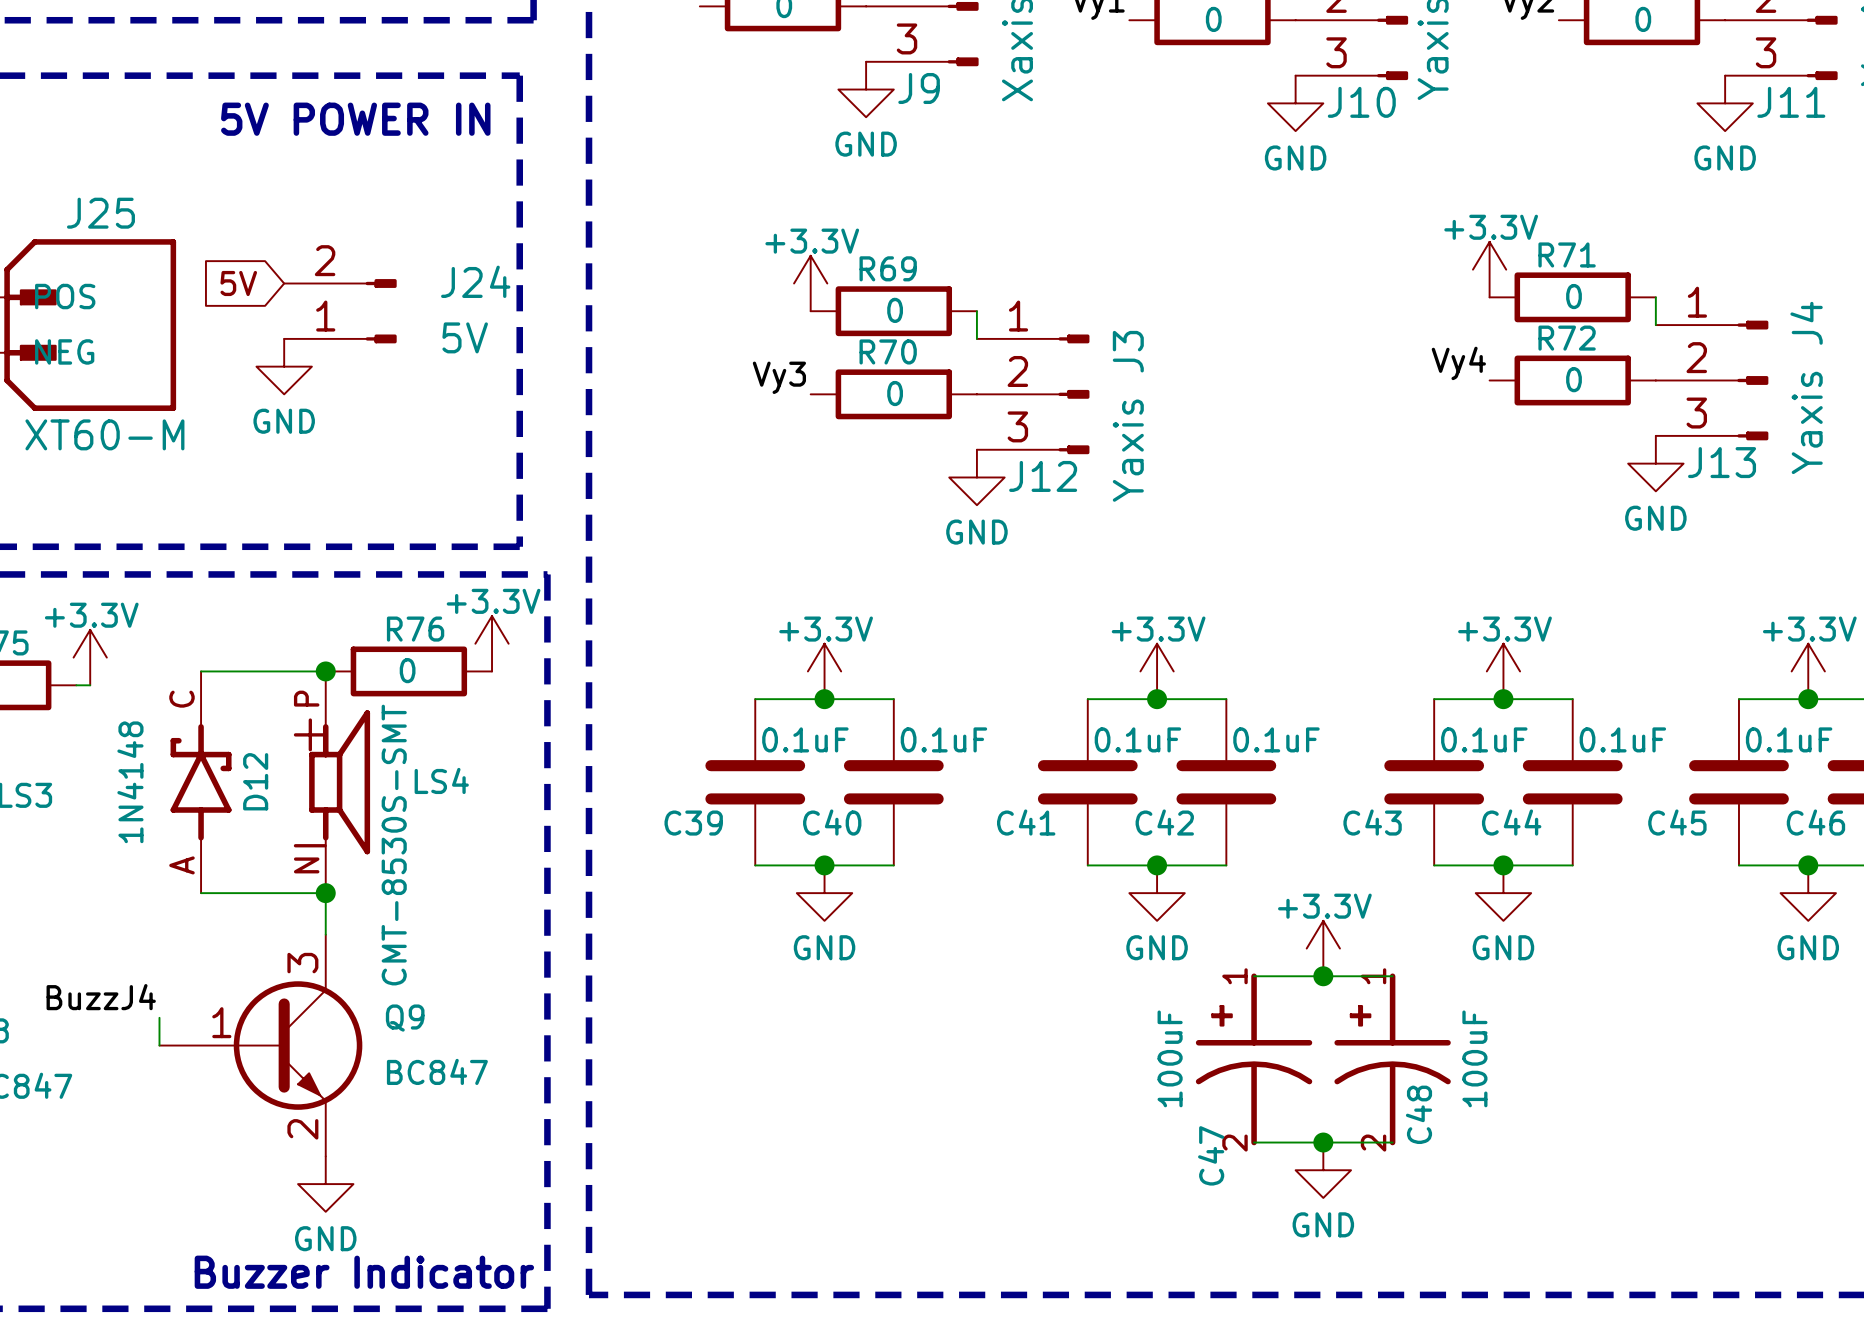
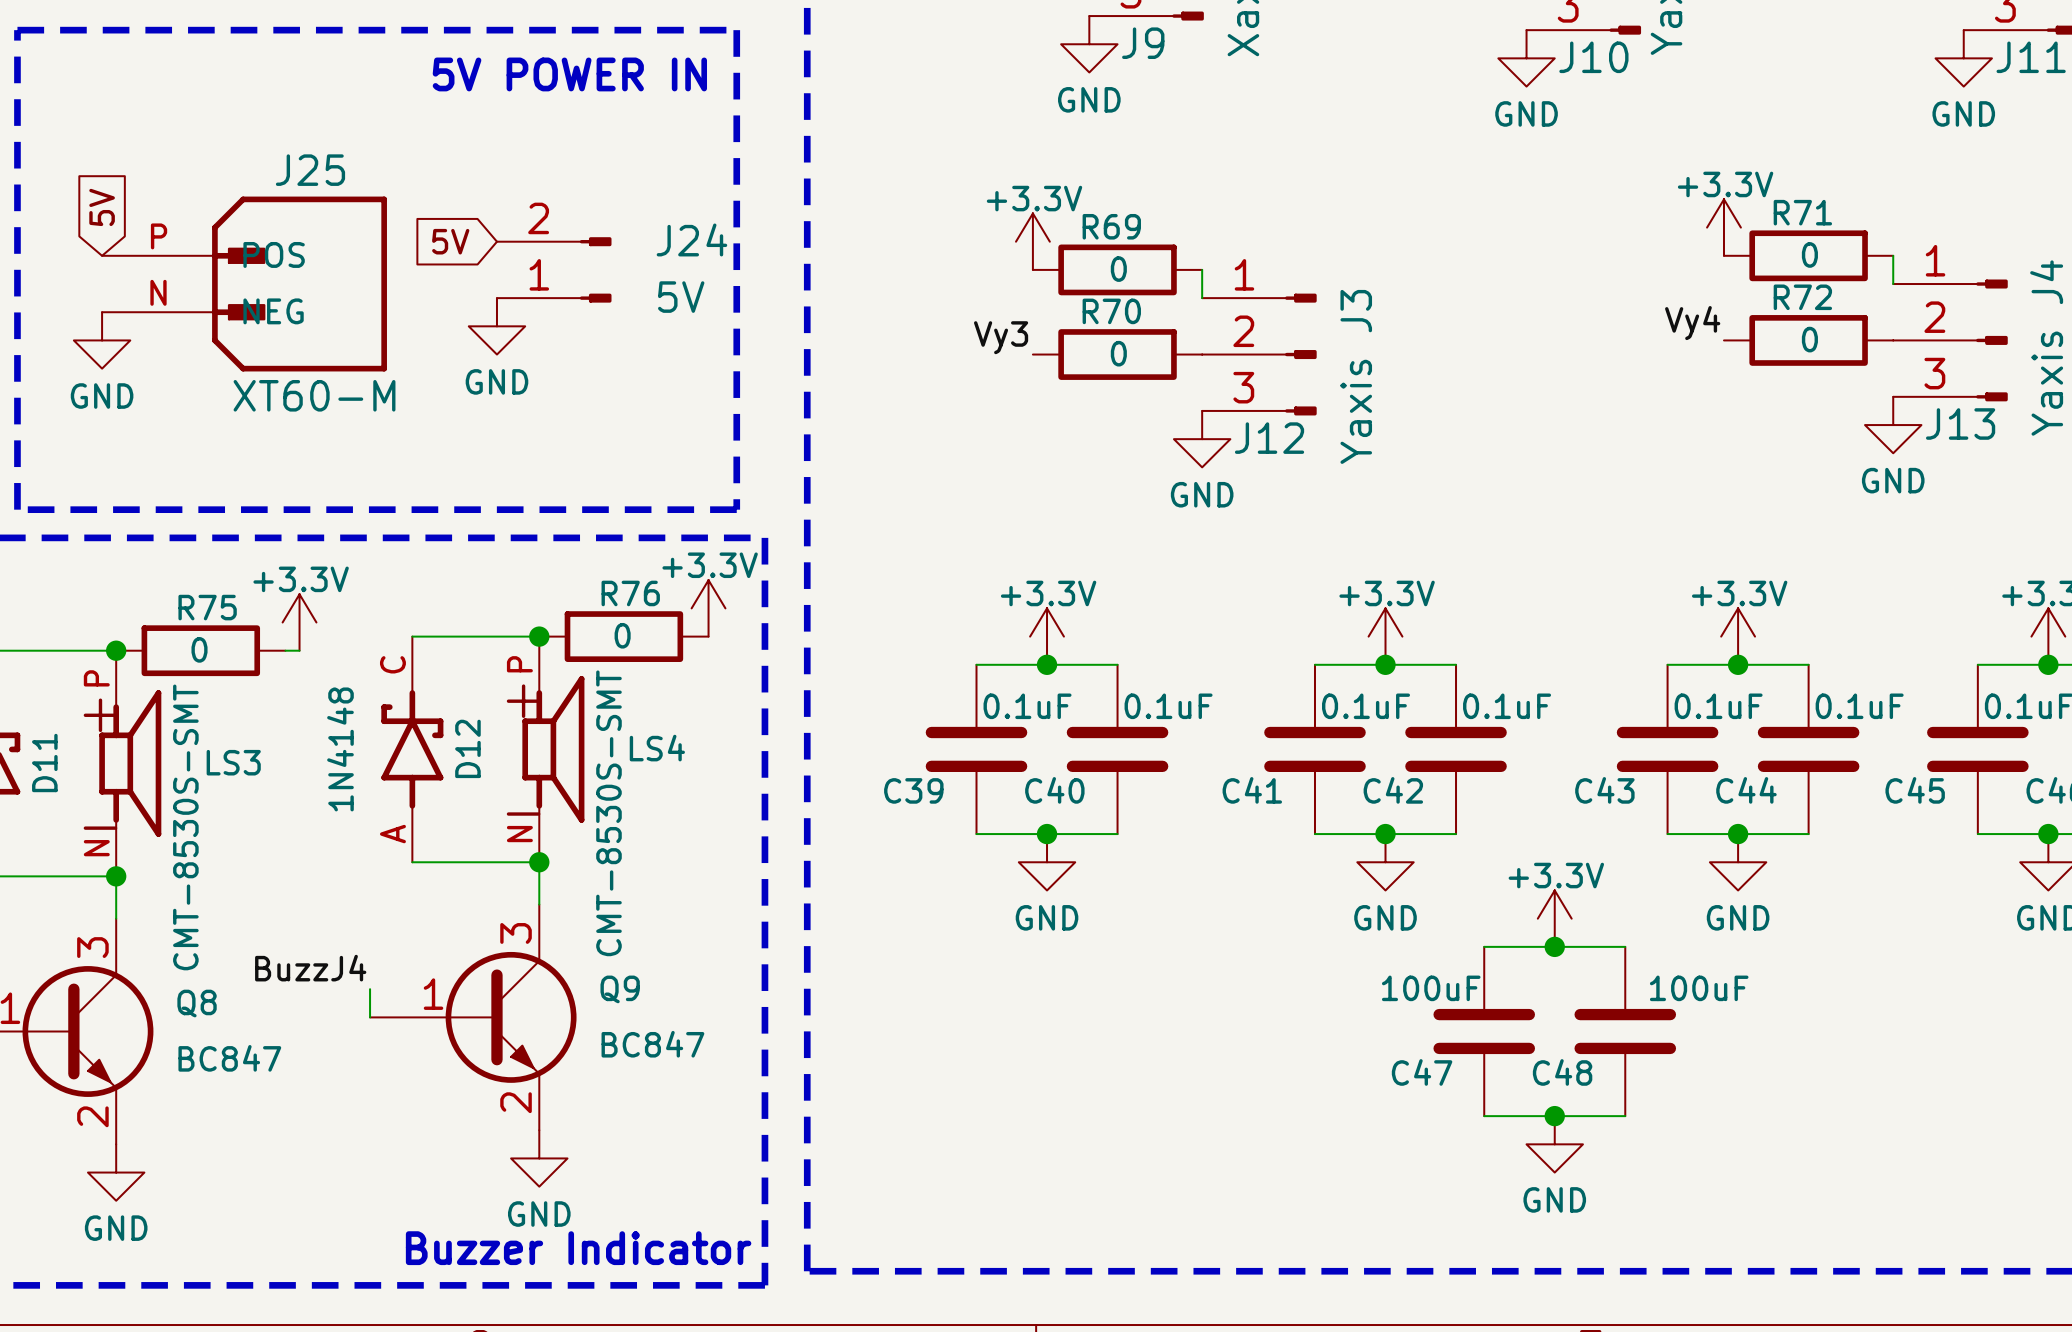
C47 symbol: [1195, 973, 1313, 1146] -> [1433, 946, 1536, 1117]
C48 symbol: [1334, 973, 1451, 1146] -> [1574, 946, 1677, 1117]
C47 value position: 100uF (1170, 1058) -> 100uF (1431, 988)
C48 value position: 100uF (1474, 1058) -> 100uF (1699, 988)
C48 name position: C48 (1418, 1114) -> C48 (1562, 1072)
C47 name position: C47 (1211, 1155) -> C47 (1422, 1072)

